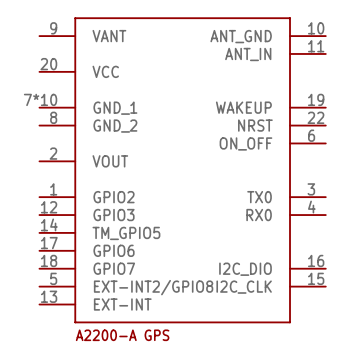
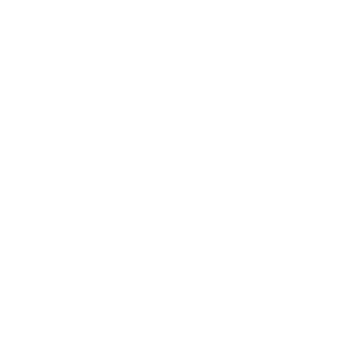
part: (182, 170) -> none

